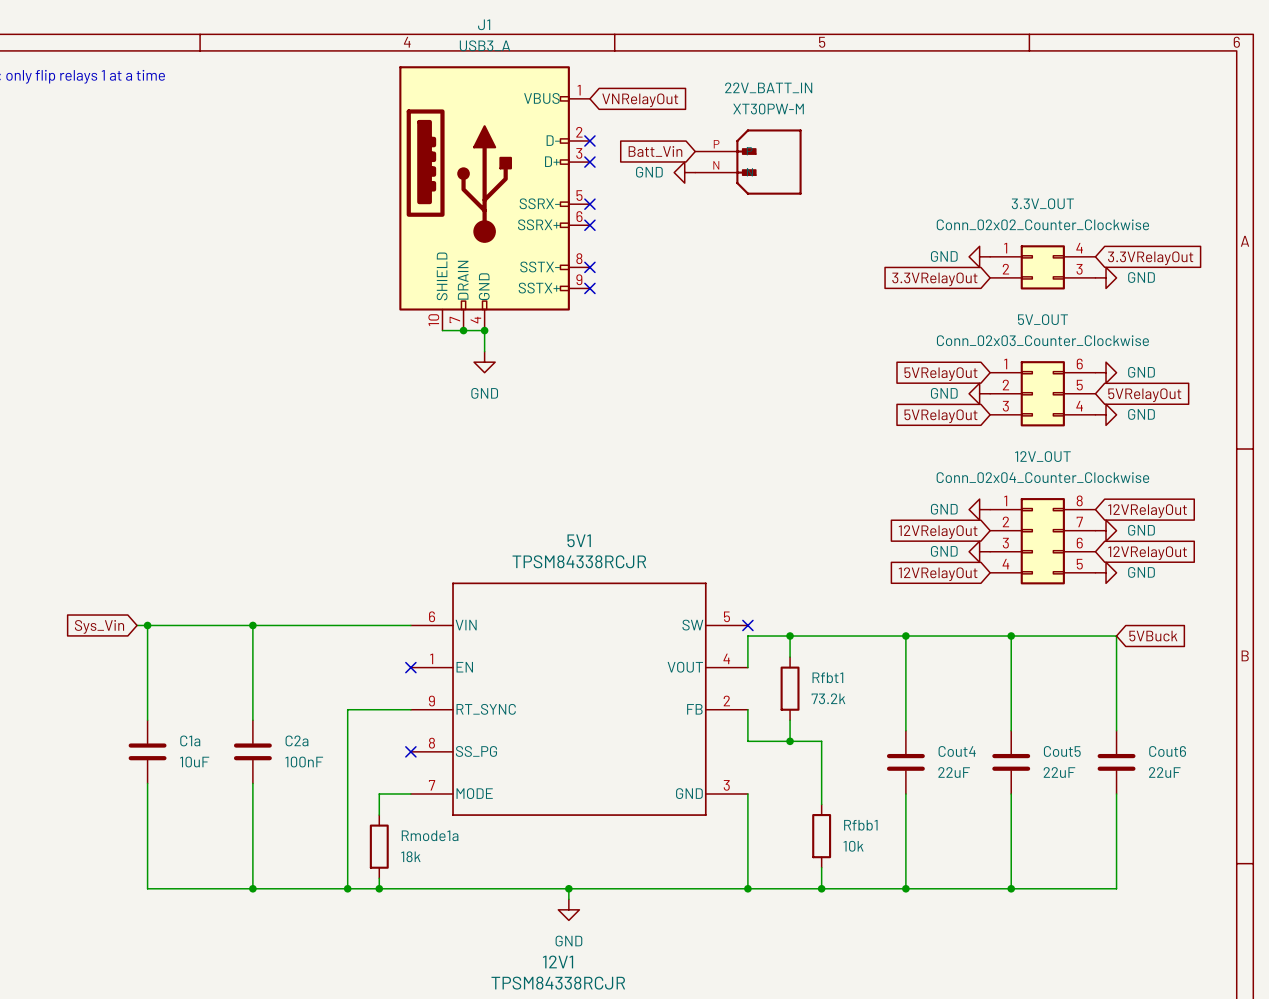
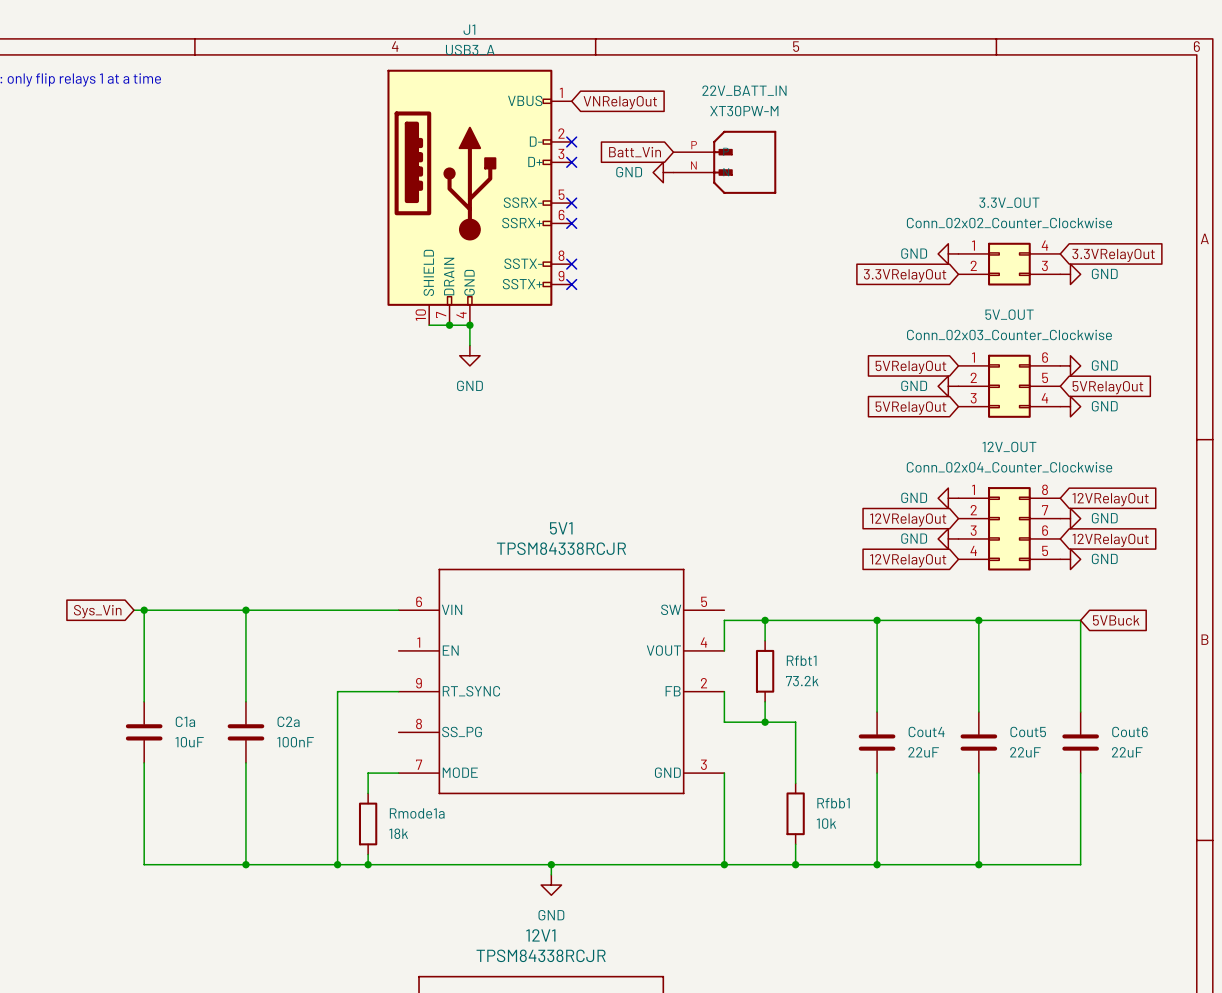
no-connect mark: (747, 625) -> none
no-connect mark: (410, 667) -> none
no-connect mark: (410, 751) -> none

